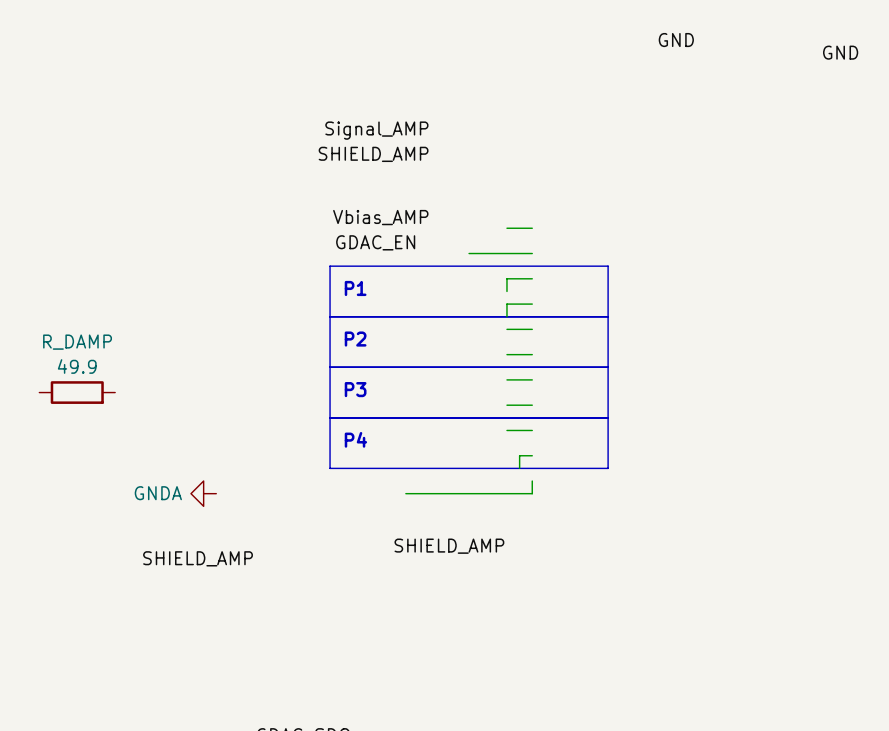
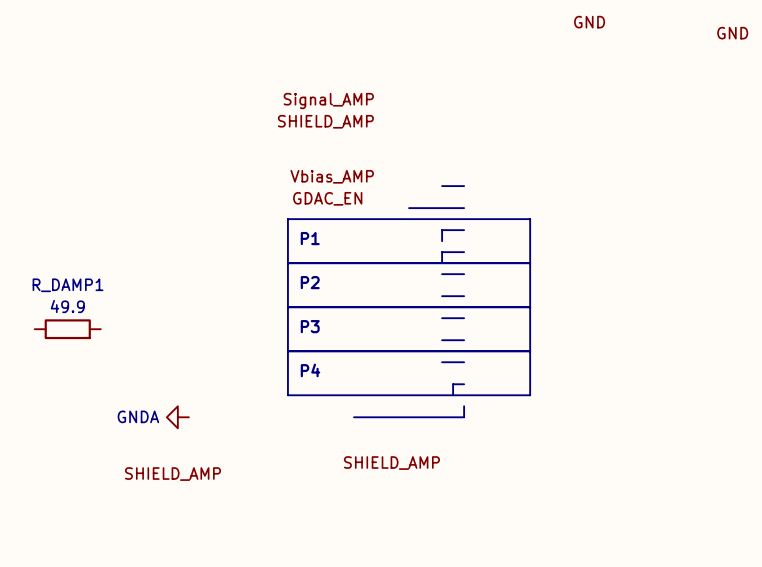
R_DAMP name: R_DAMP (77, 342) -> R_DAMP1 (68, 285)

